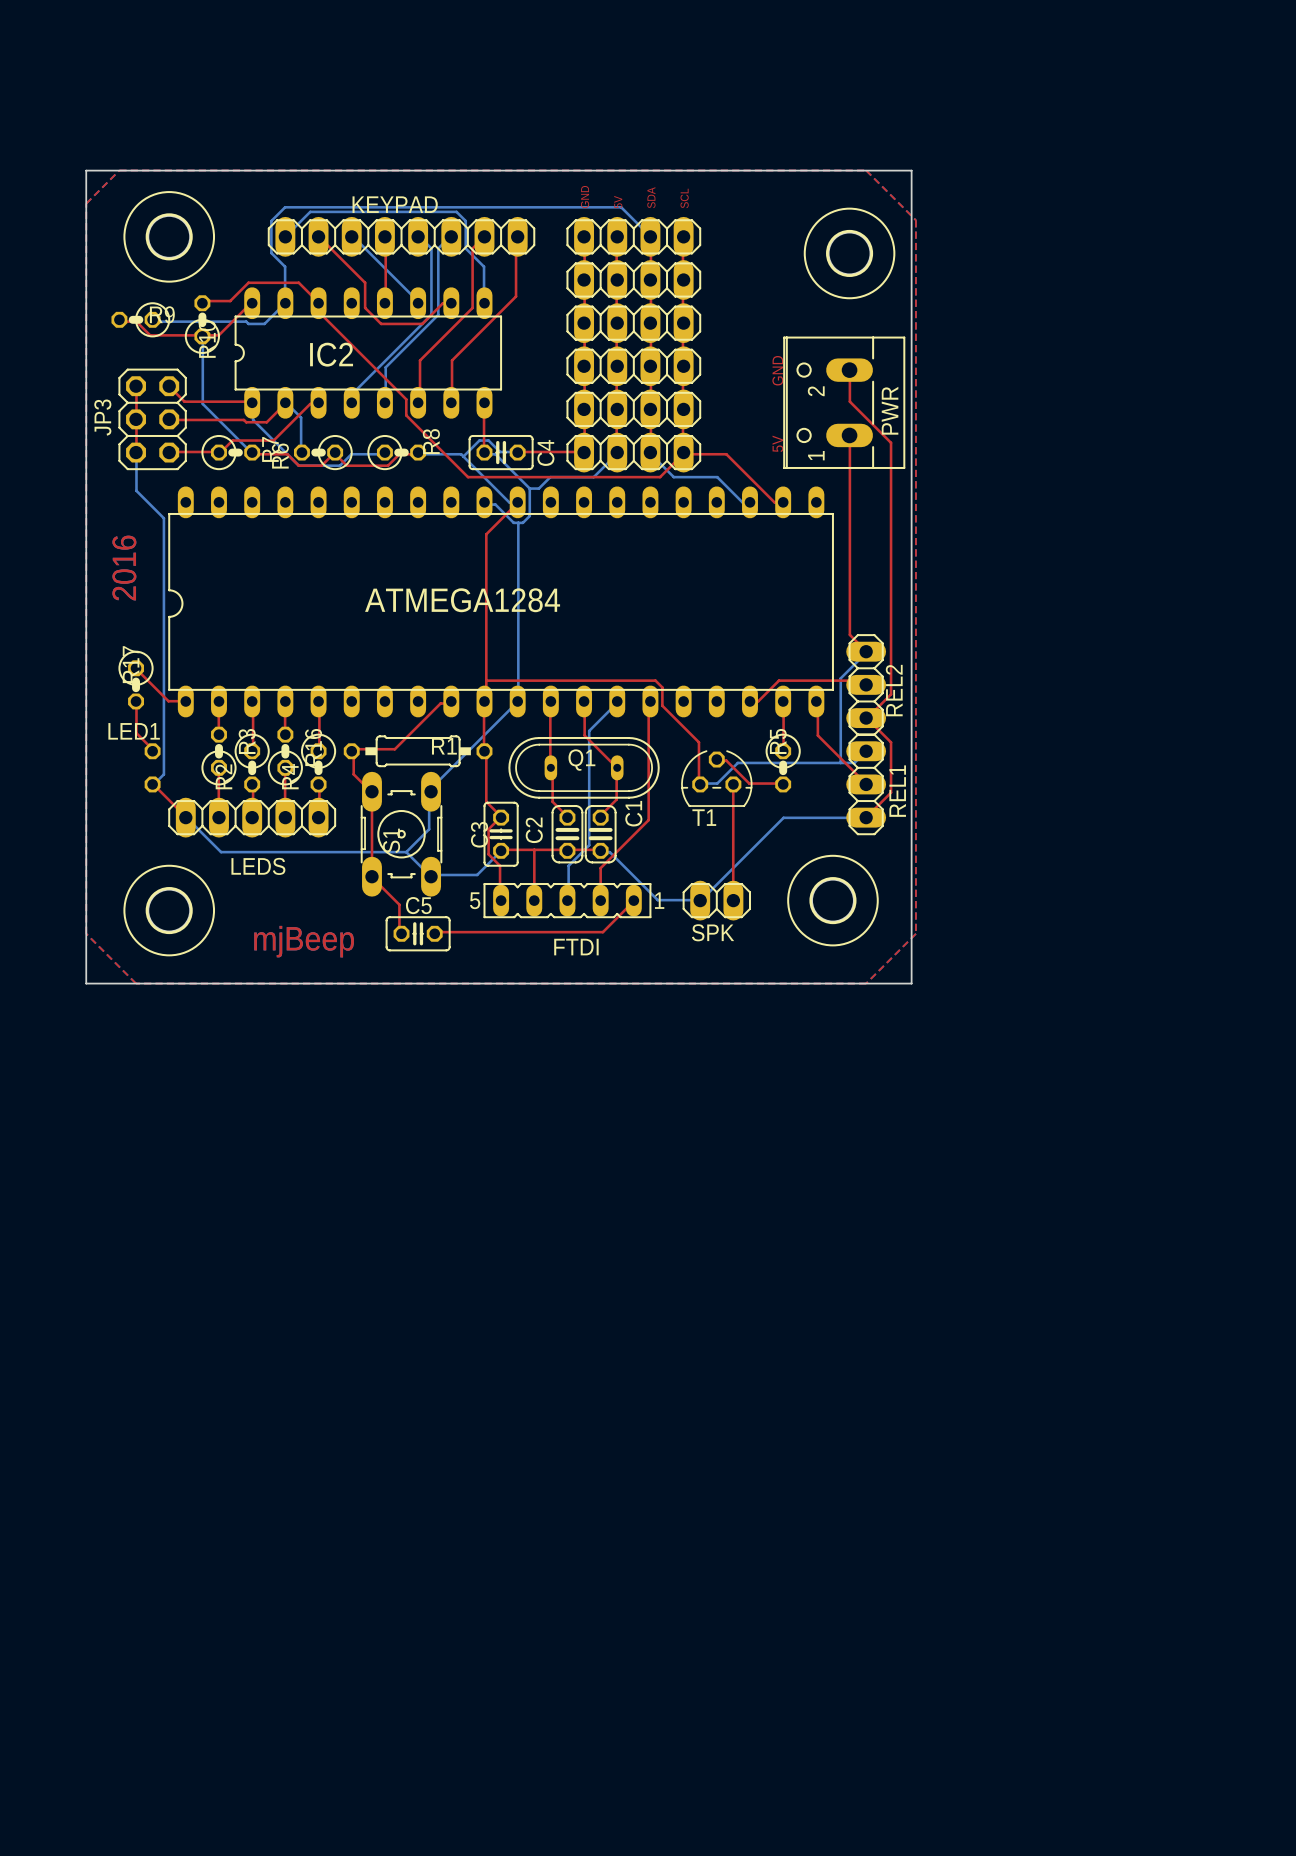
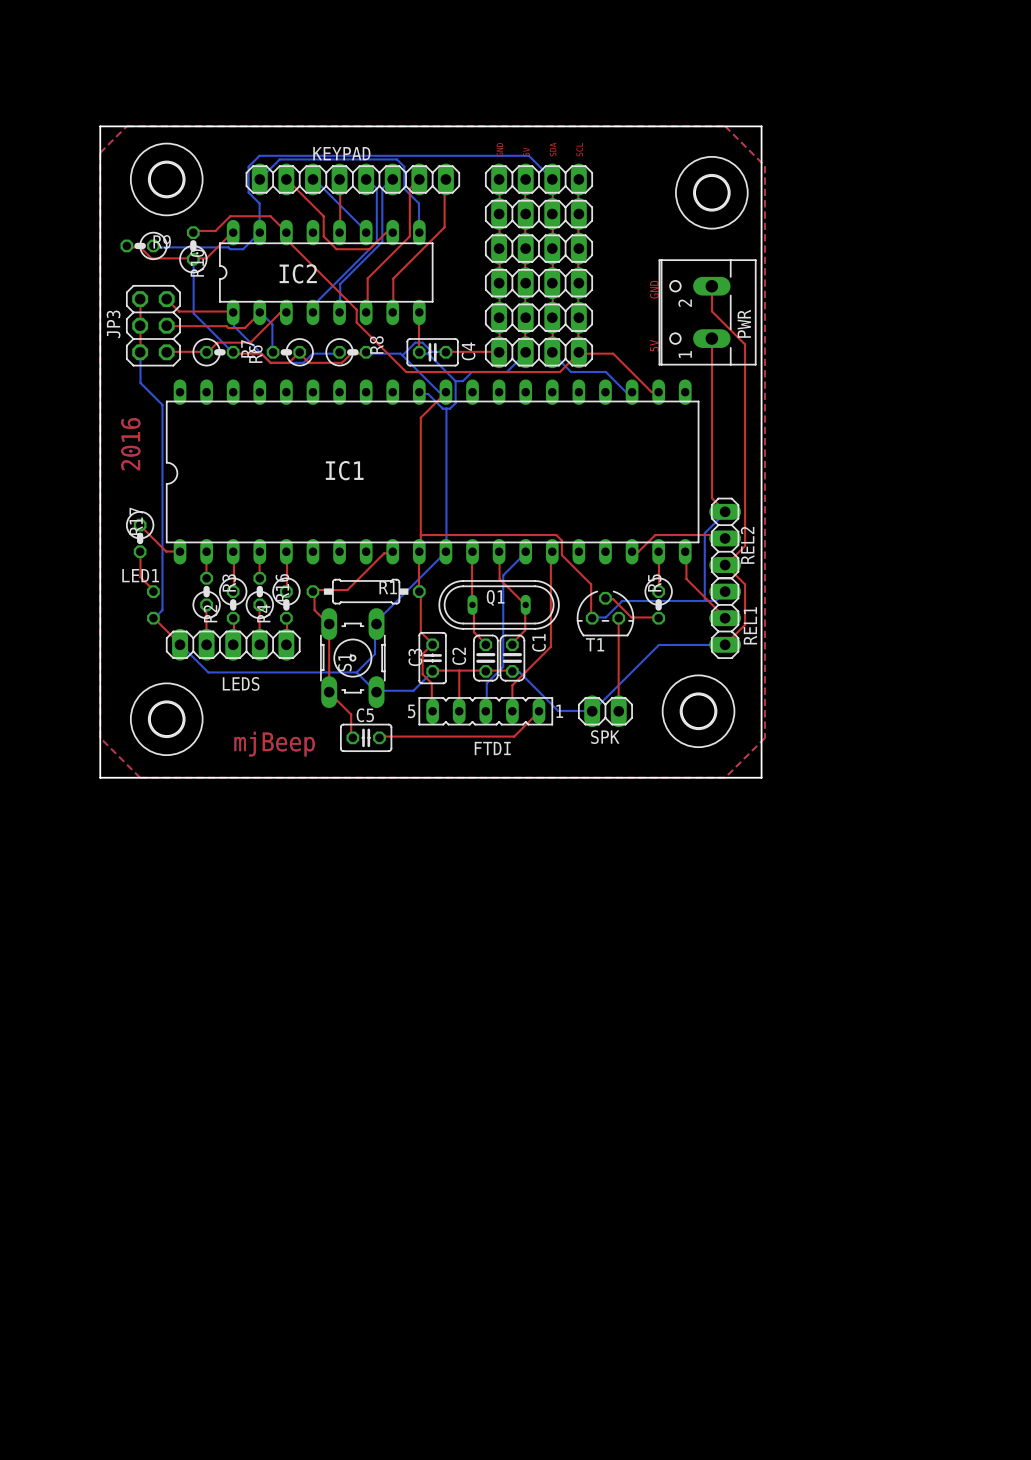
ATMEGA1284 name: ATMEGA1284 (462, 600) -> IC1 (344, 470)

